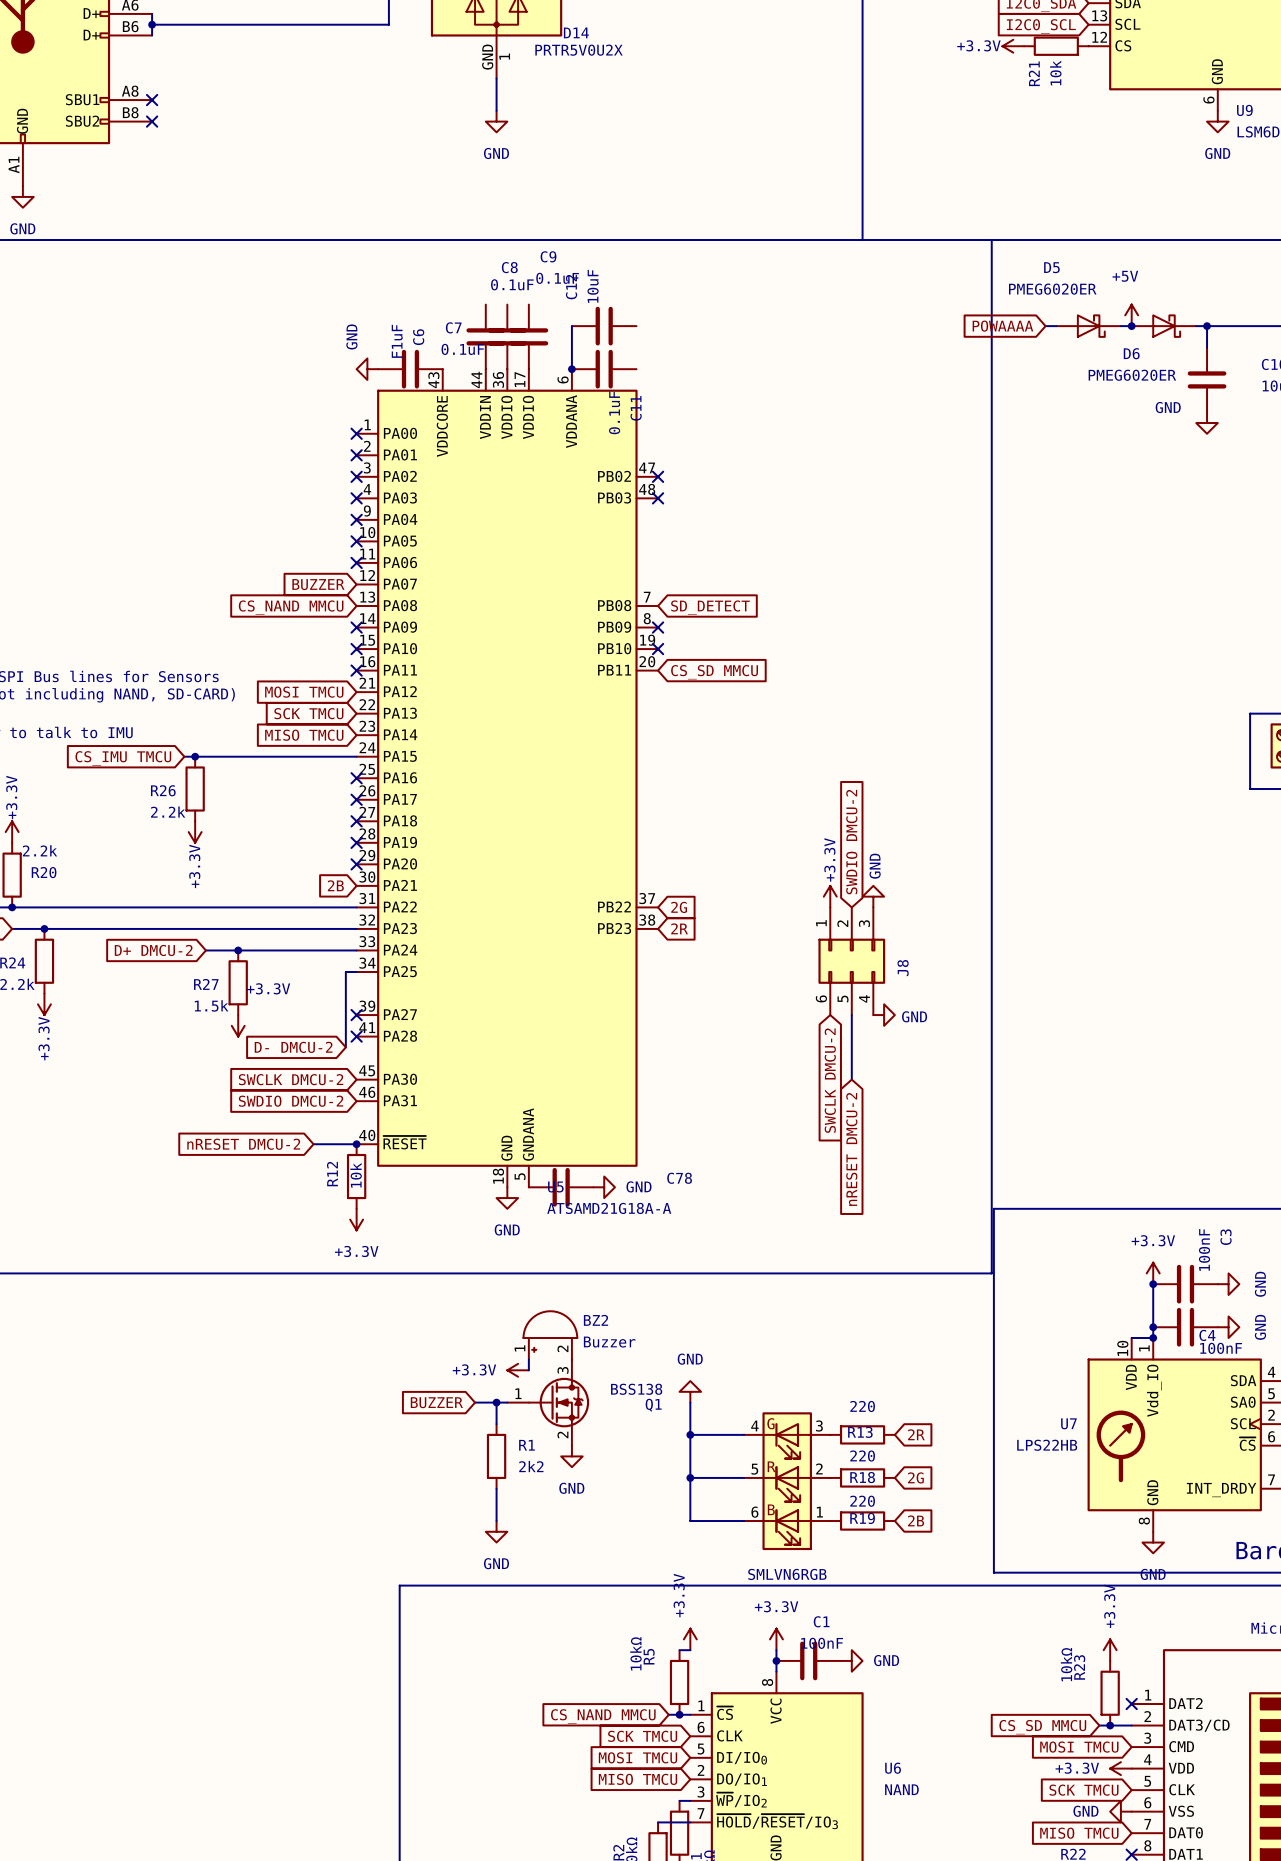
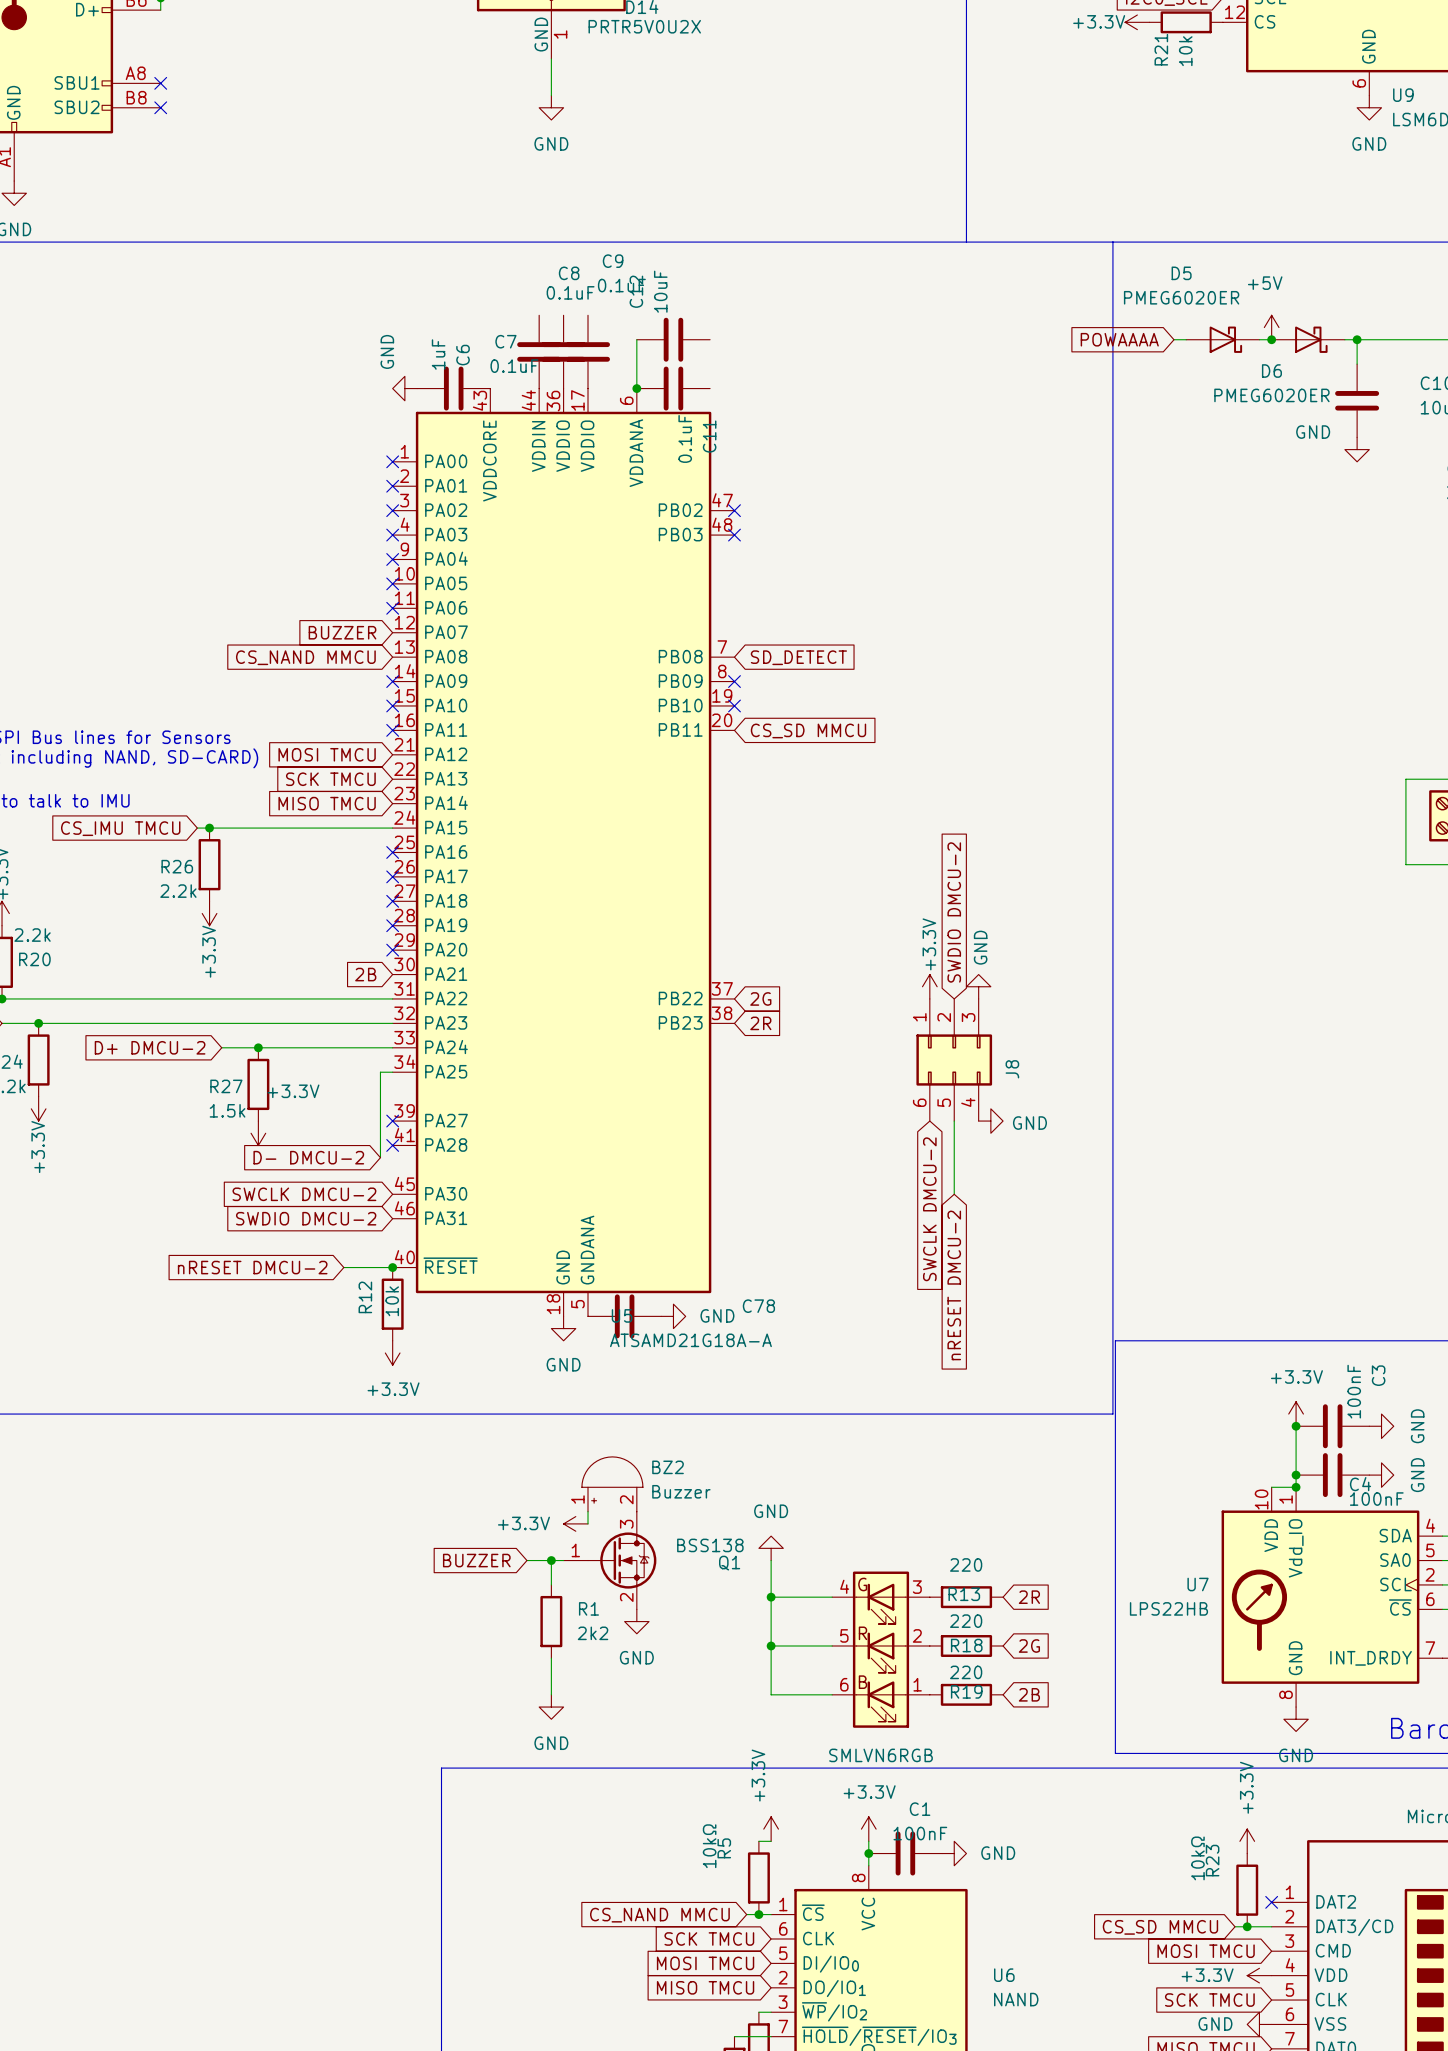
C6 value: F1uF (397, 341) -> 1uF (438, 354)

